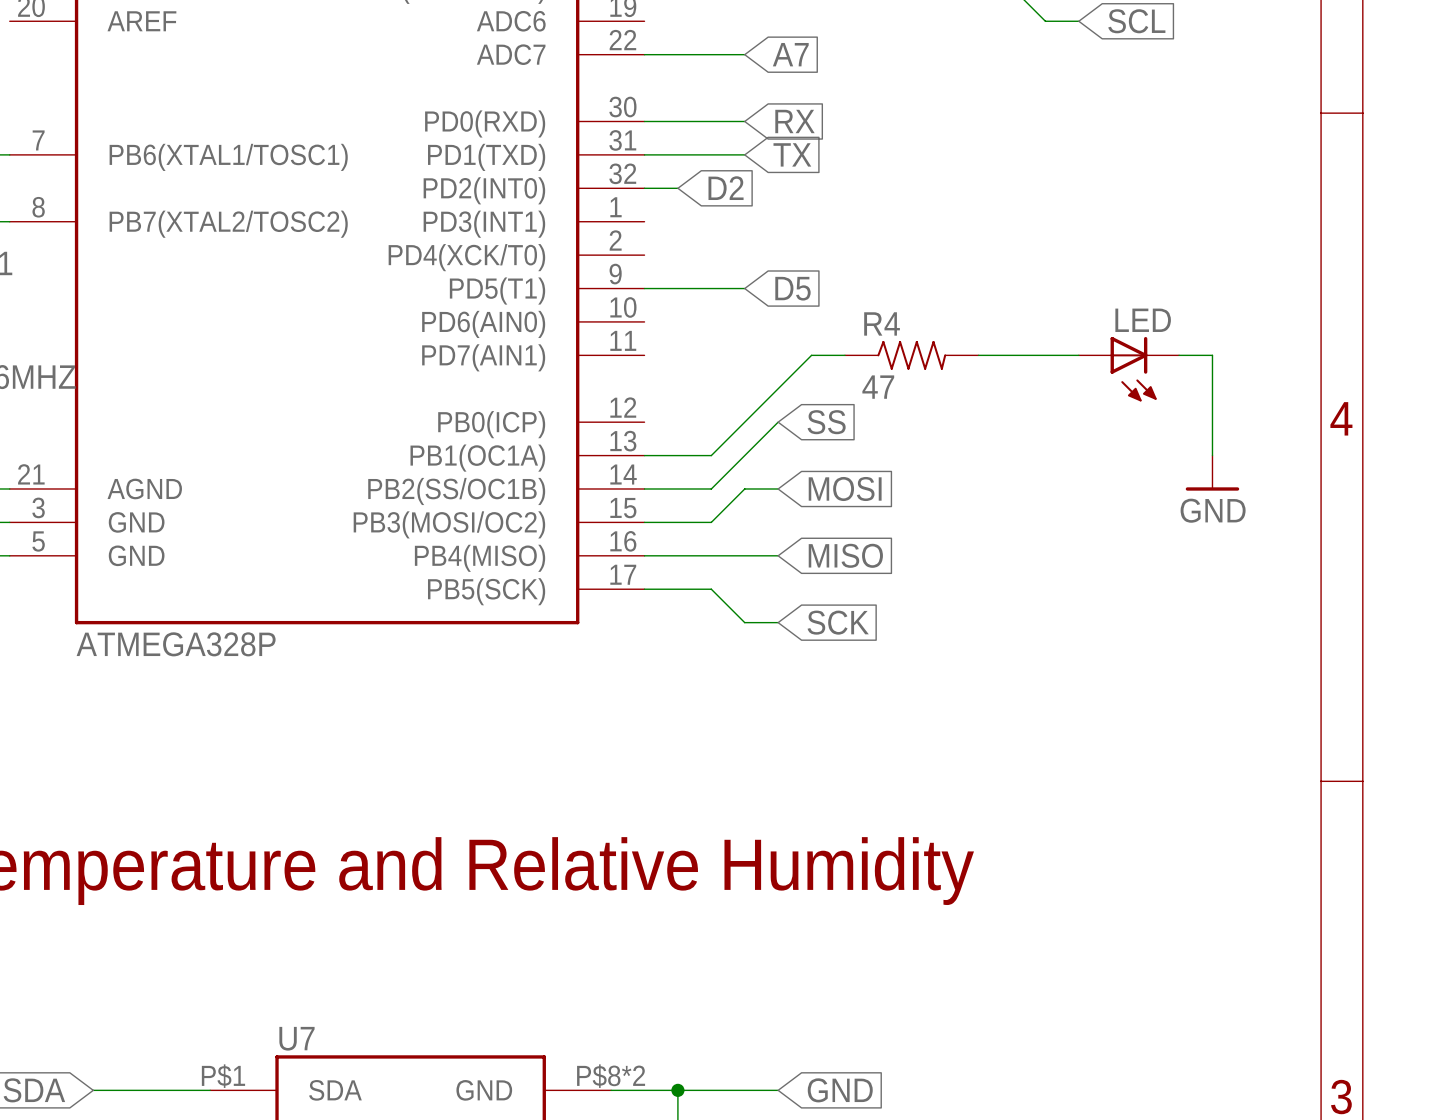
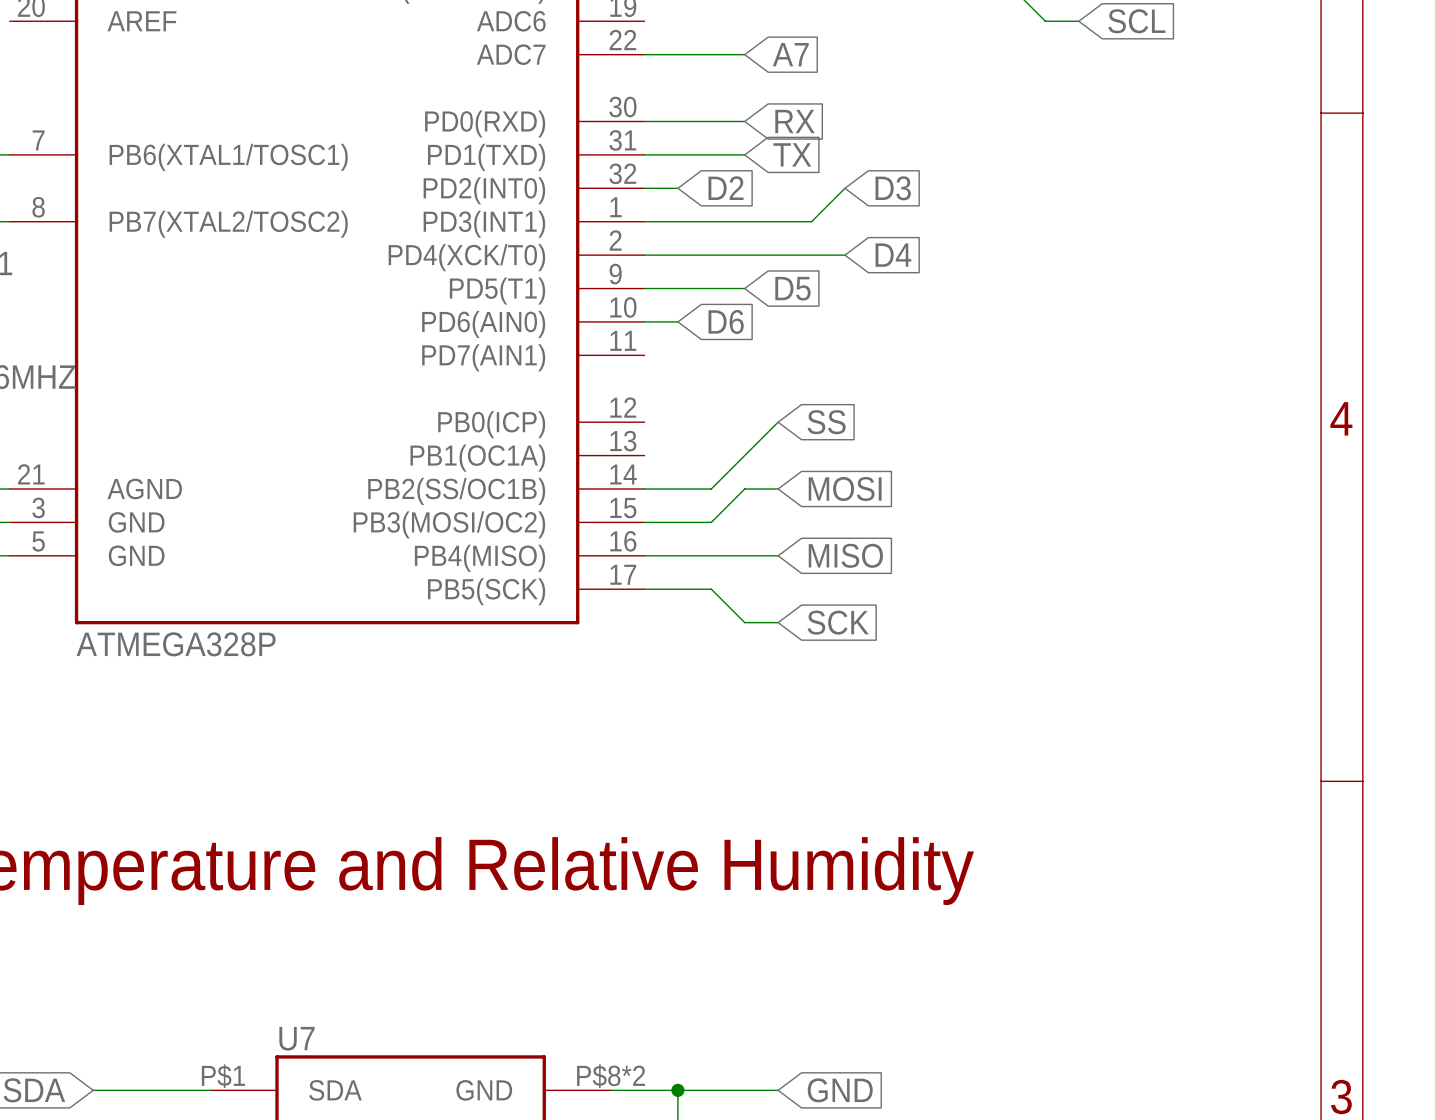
wire: none -> (844, 188) (811, 221) (644, 221)
global label: none -> D3 (893, 188)
wire: none -> (644, 255) (844, 255)
global label: none -> D4 (893, 255)
wire: none -> (644, 321) (677, 321)
global label: none -> D6 (726, 321)
wire: (844, 355) (811, 355) (711, 455) (644, 455) -> none
R4: 47 (911, 355) -> none
wire: (978, 355) (1078, 355) -> none
wire: (1179, 355) (1212, 355) (1212, 455) -> none
LED: (1128, 369) -> none
power symbol: GND (1212, 473) -> none

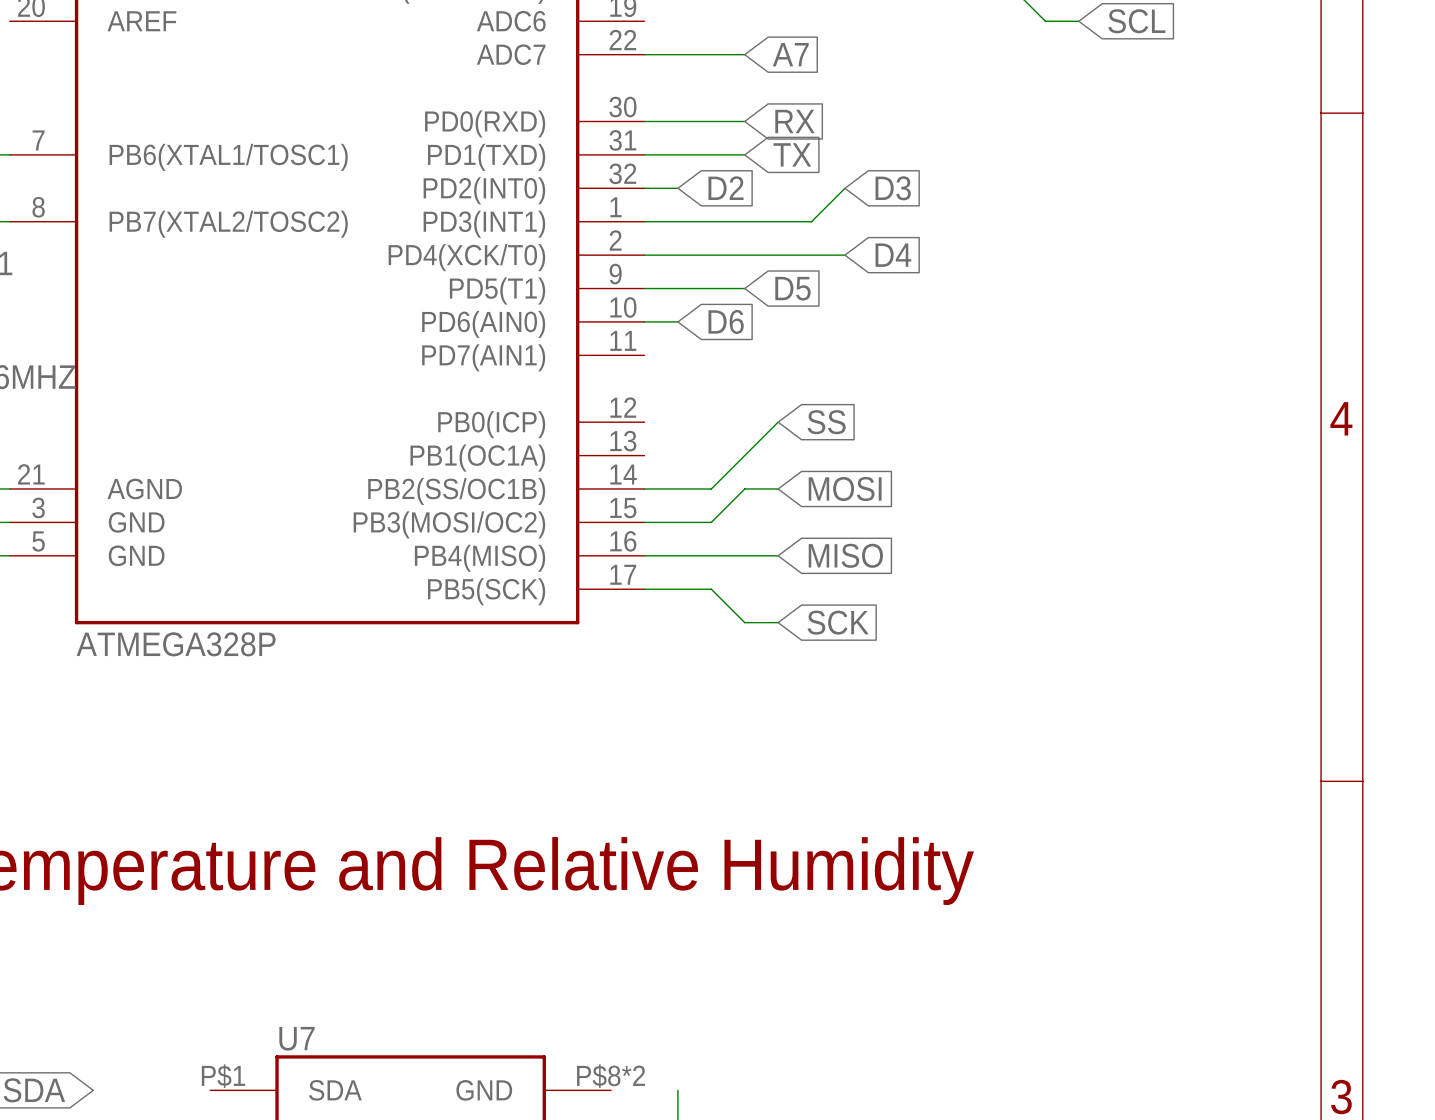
wire: (93, 1090) (210, 1090) -> none
wire: (611, 1090) (778, 1090) -> none
junction: (677, 1090) -> none
global label: GND (840, 1090) -> none

